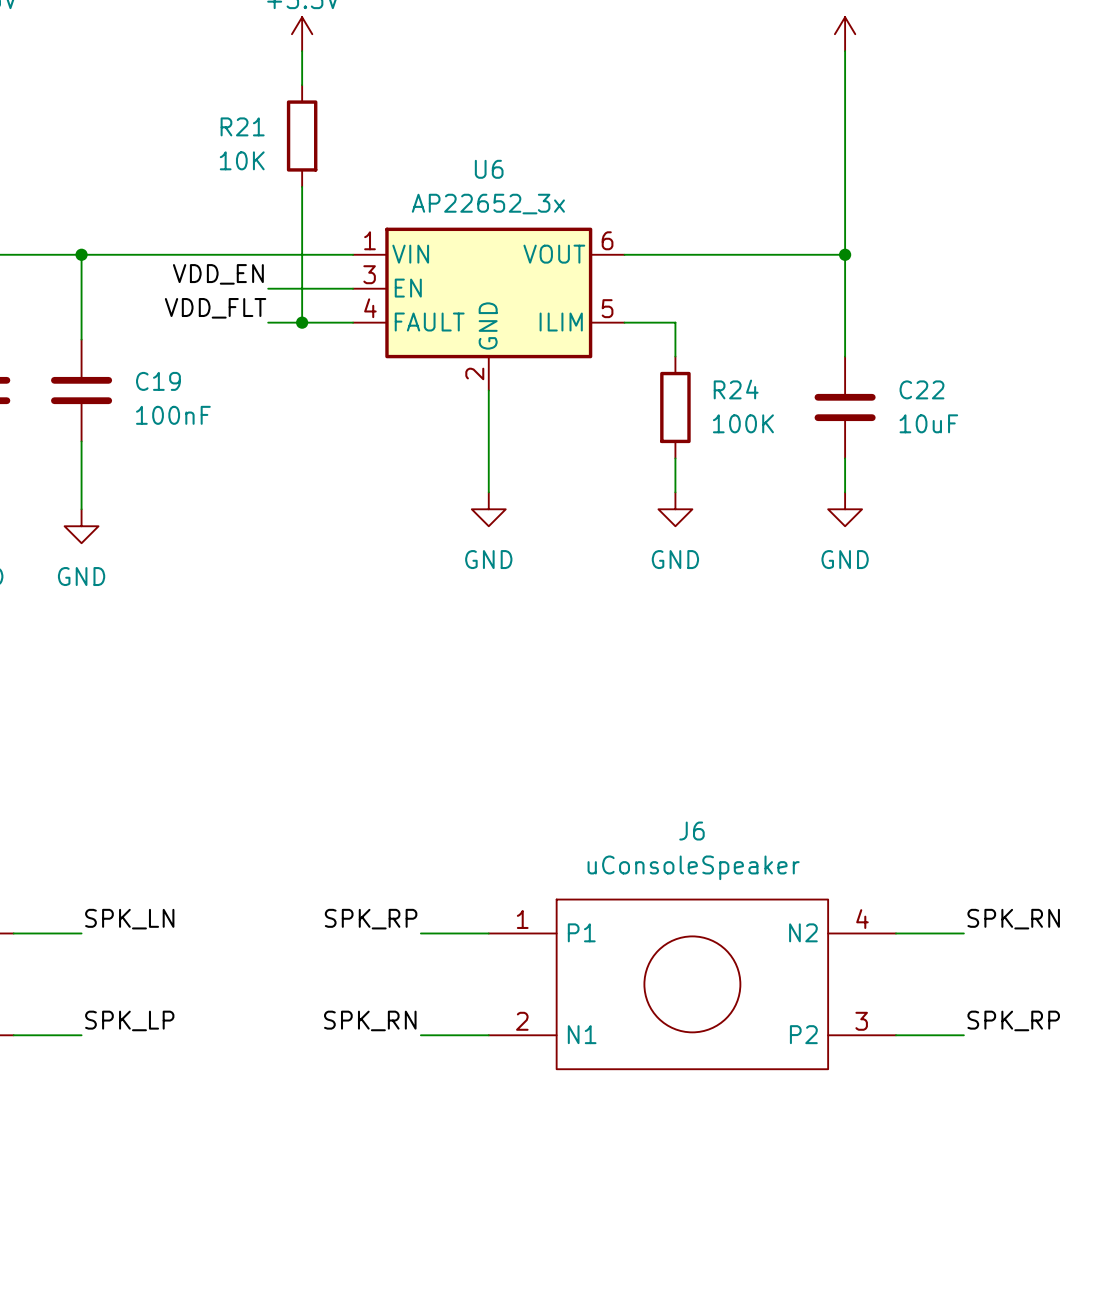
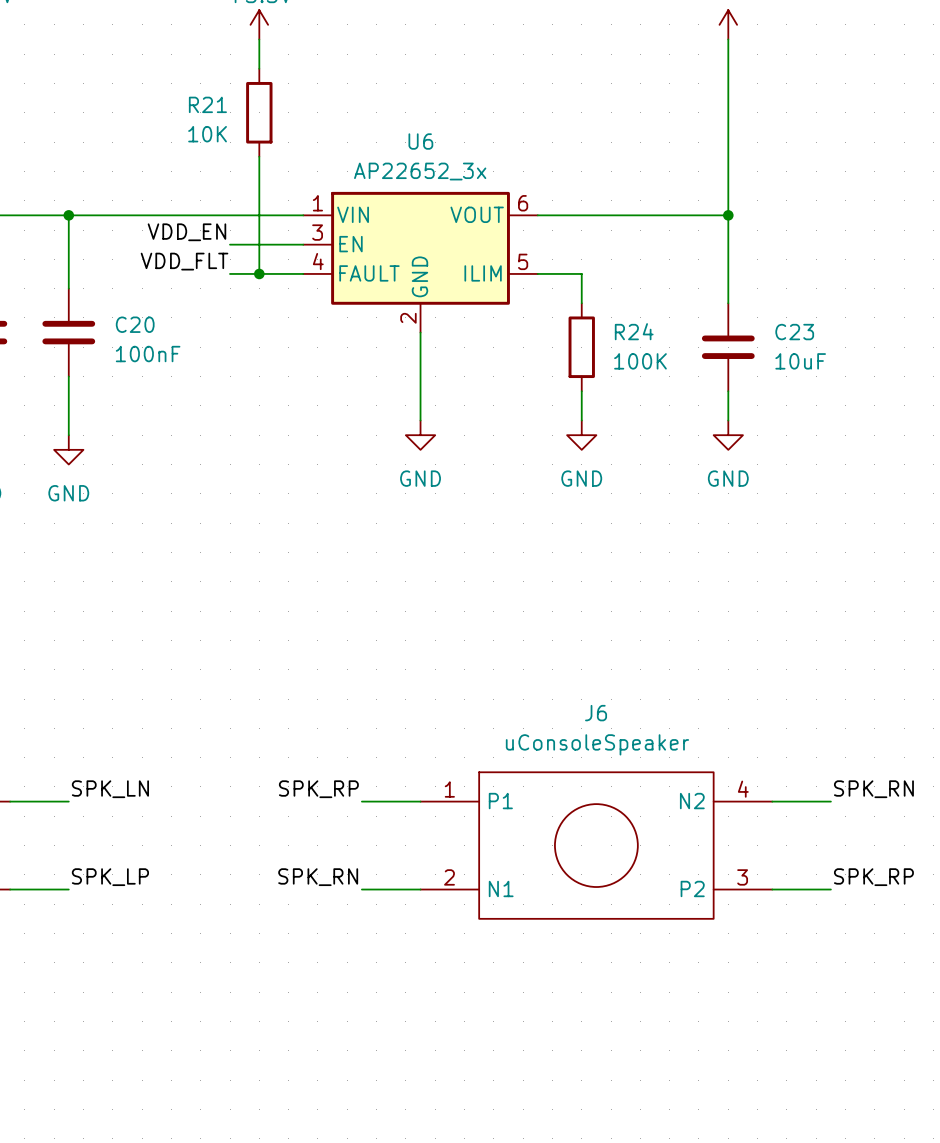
C19 name: C19 (158, 381) -> C20 (135, 324)
C22 name: C22 (921, 389) -> C23 (794, 332)

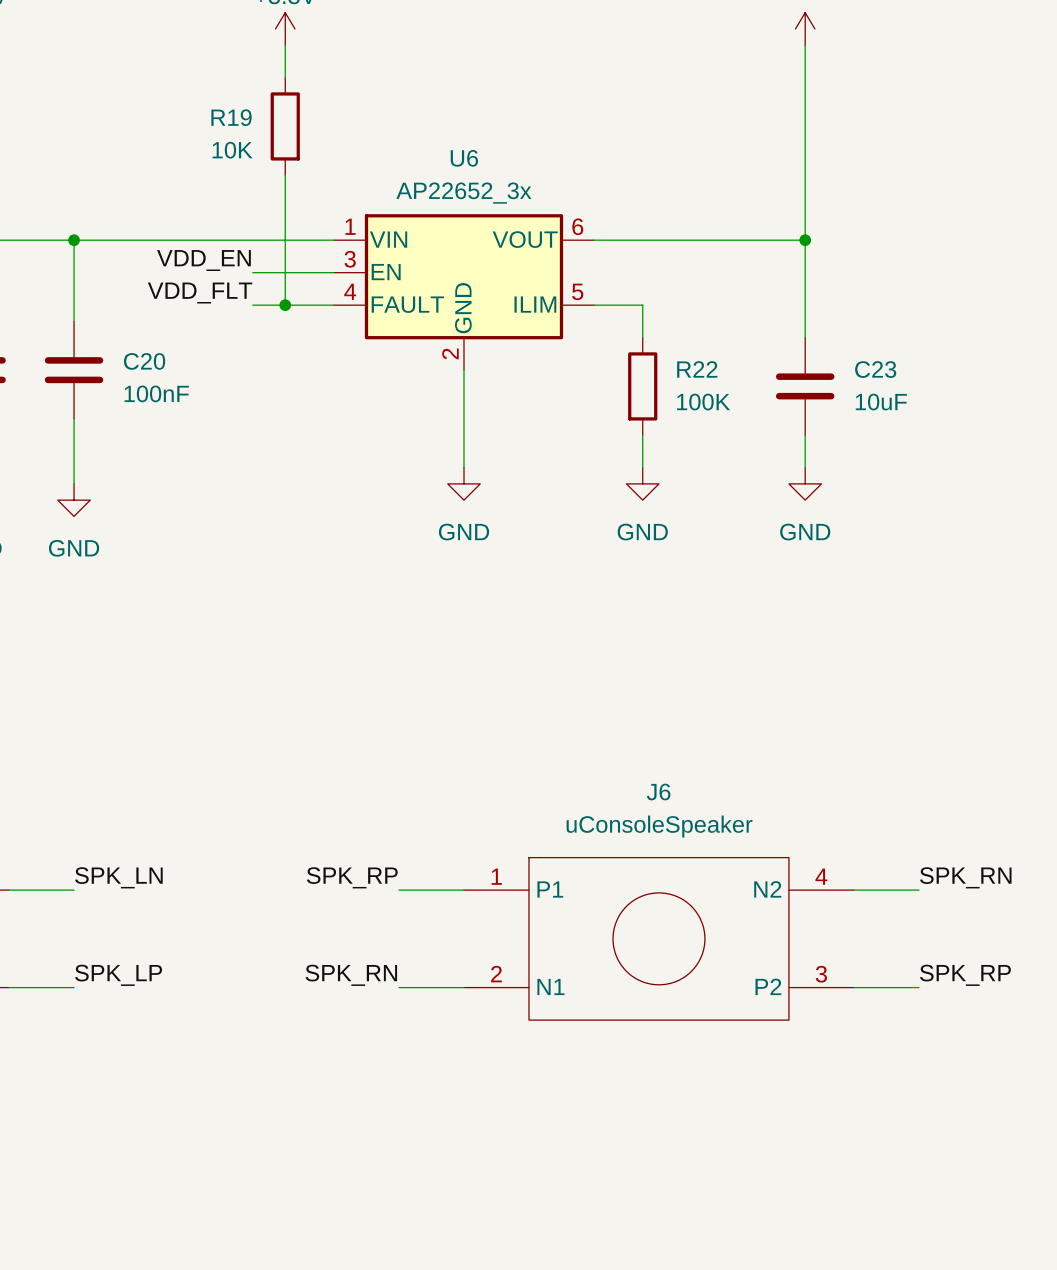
R21 name: R21 (207, 104) -> R19 (231, 117)
R24 name: R24 (634, 331) -> R22 (697, 369)

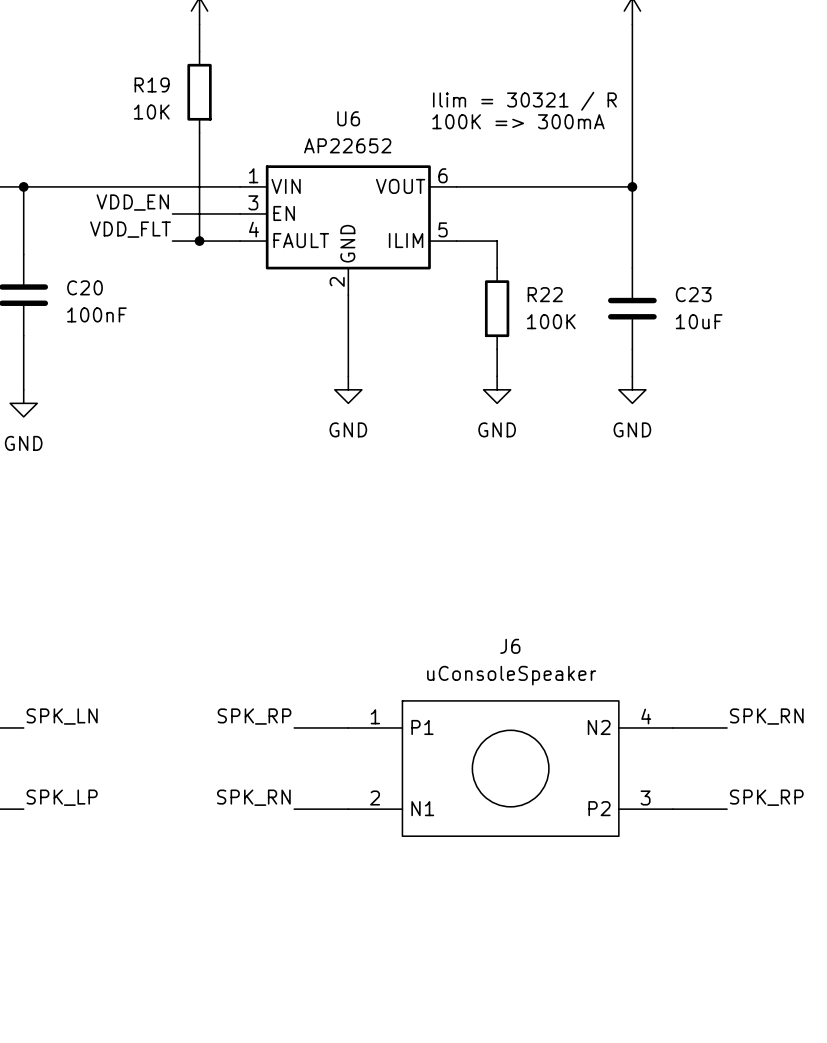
text: none -> Ilim = 30321 / R (524, 101)
text: none -> 100K => 300mA (518, 121)
U6 value: AP22652_3x (463, 193) -> AP22652 (347, 145)

